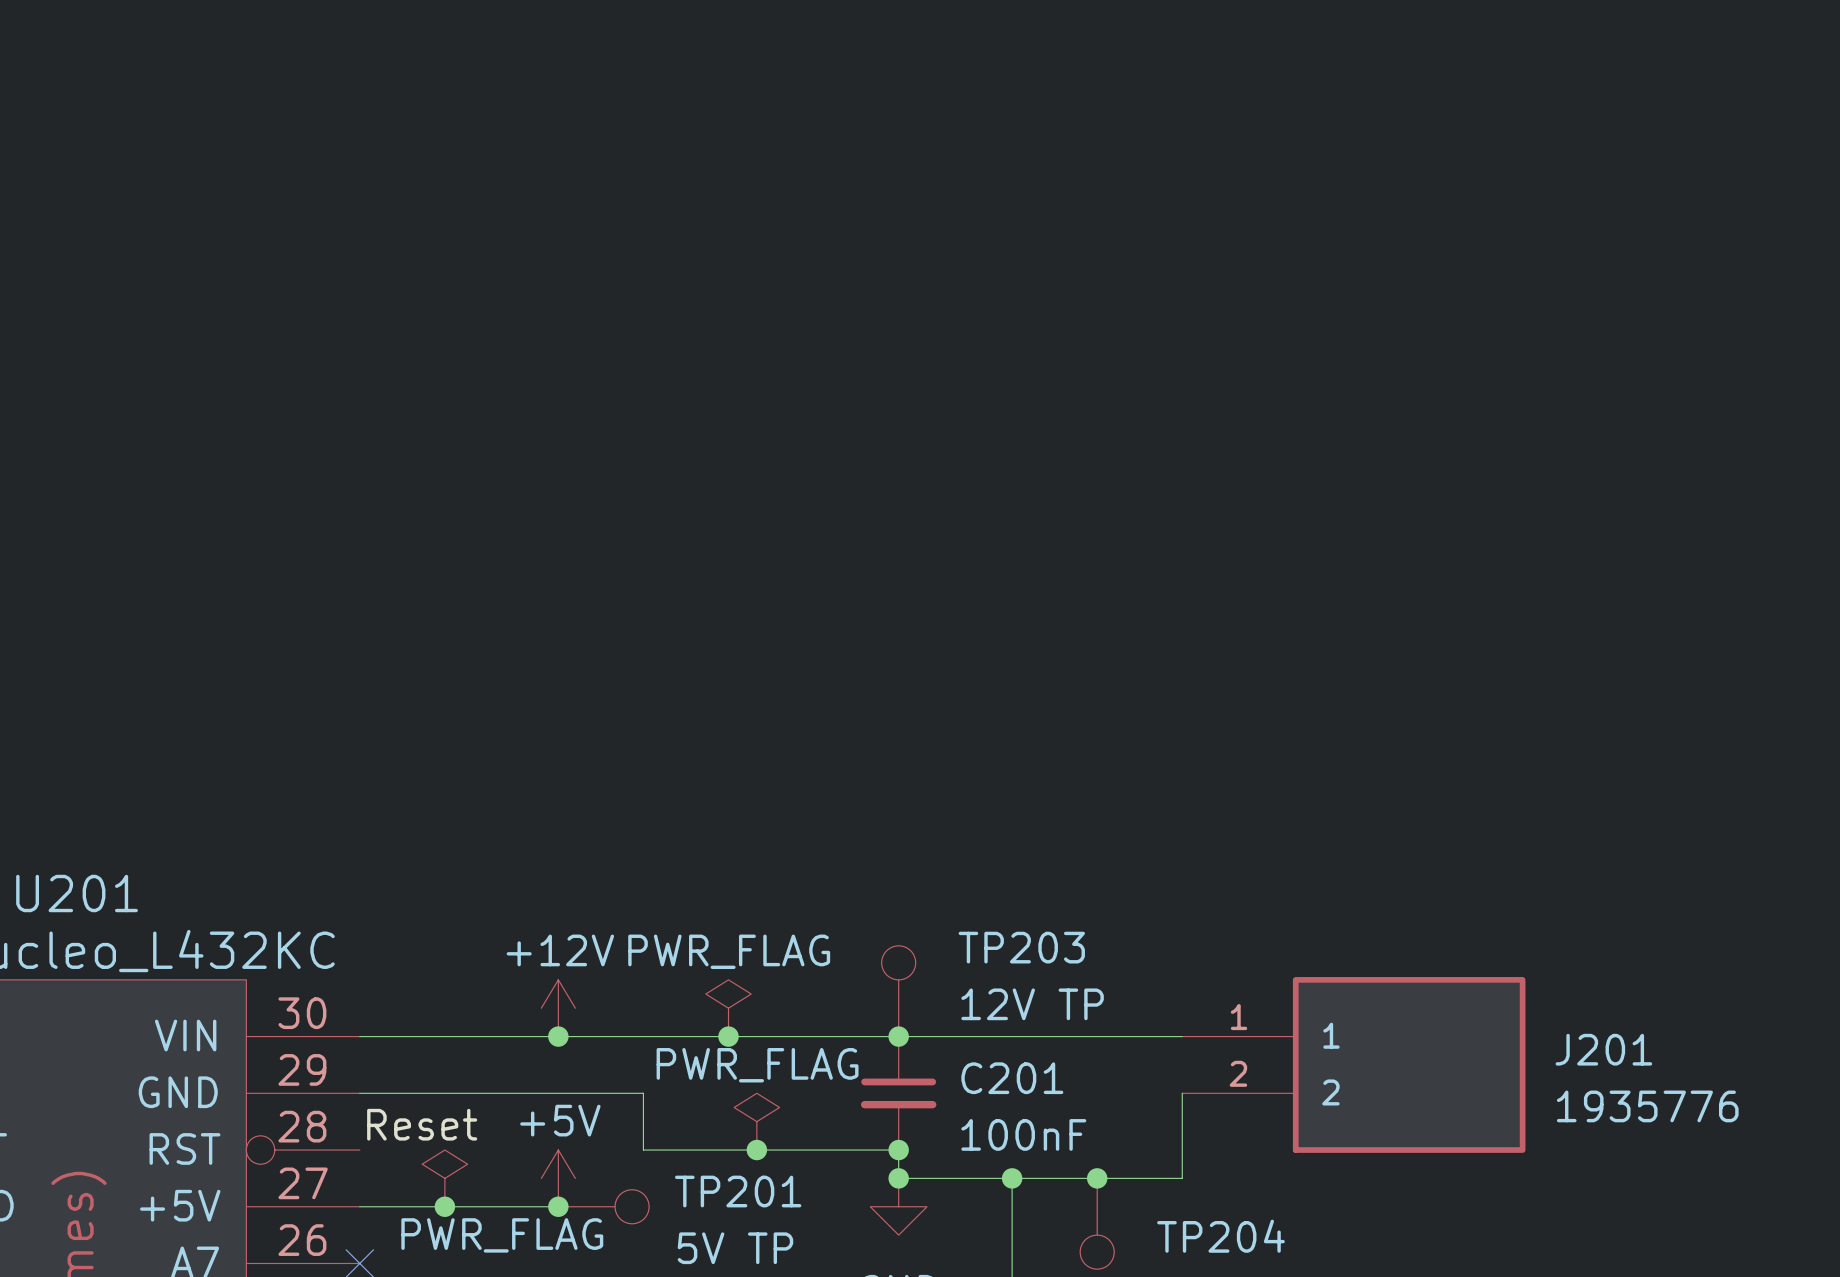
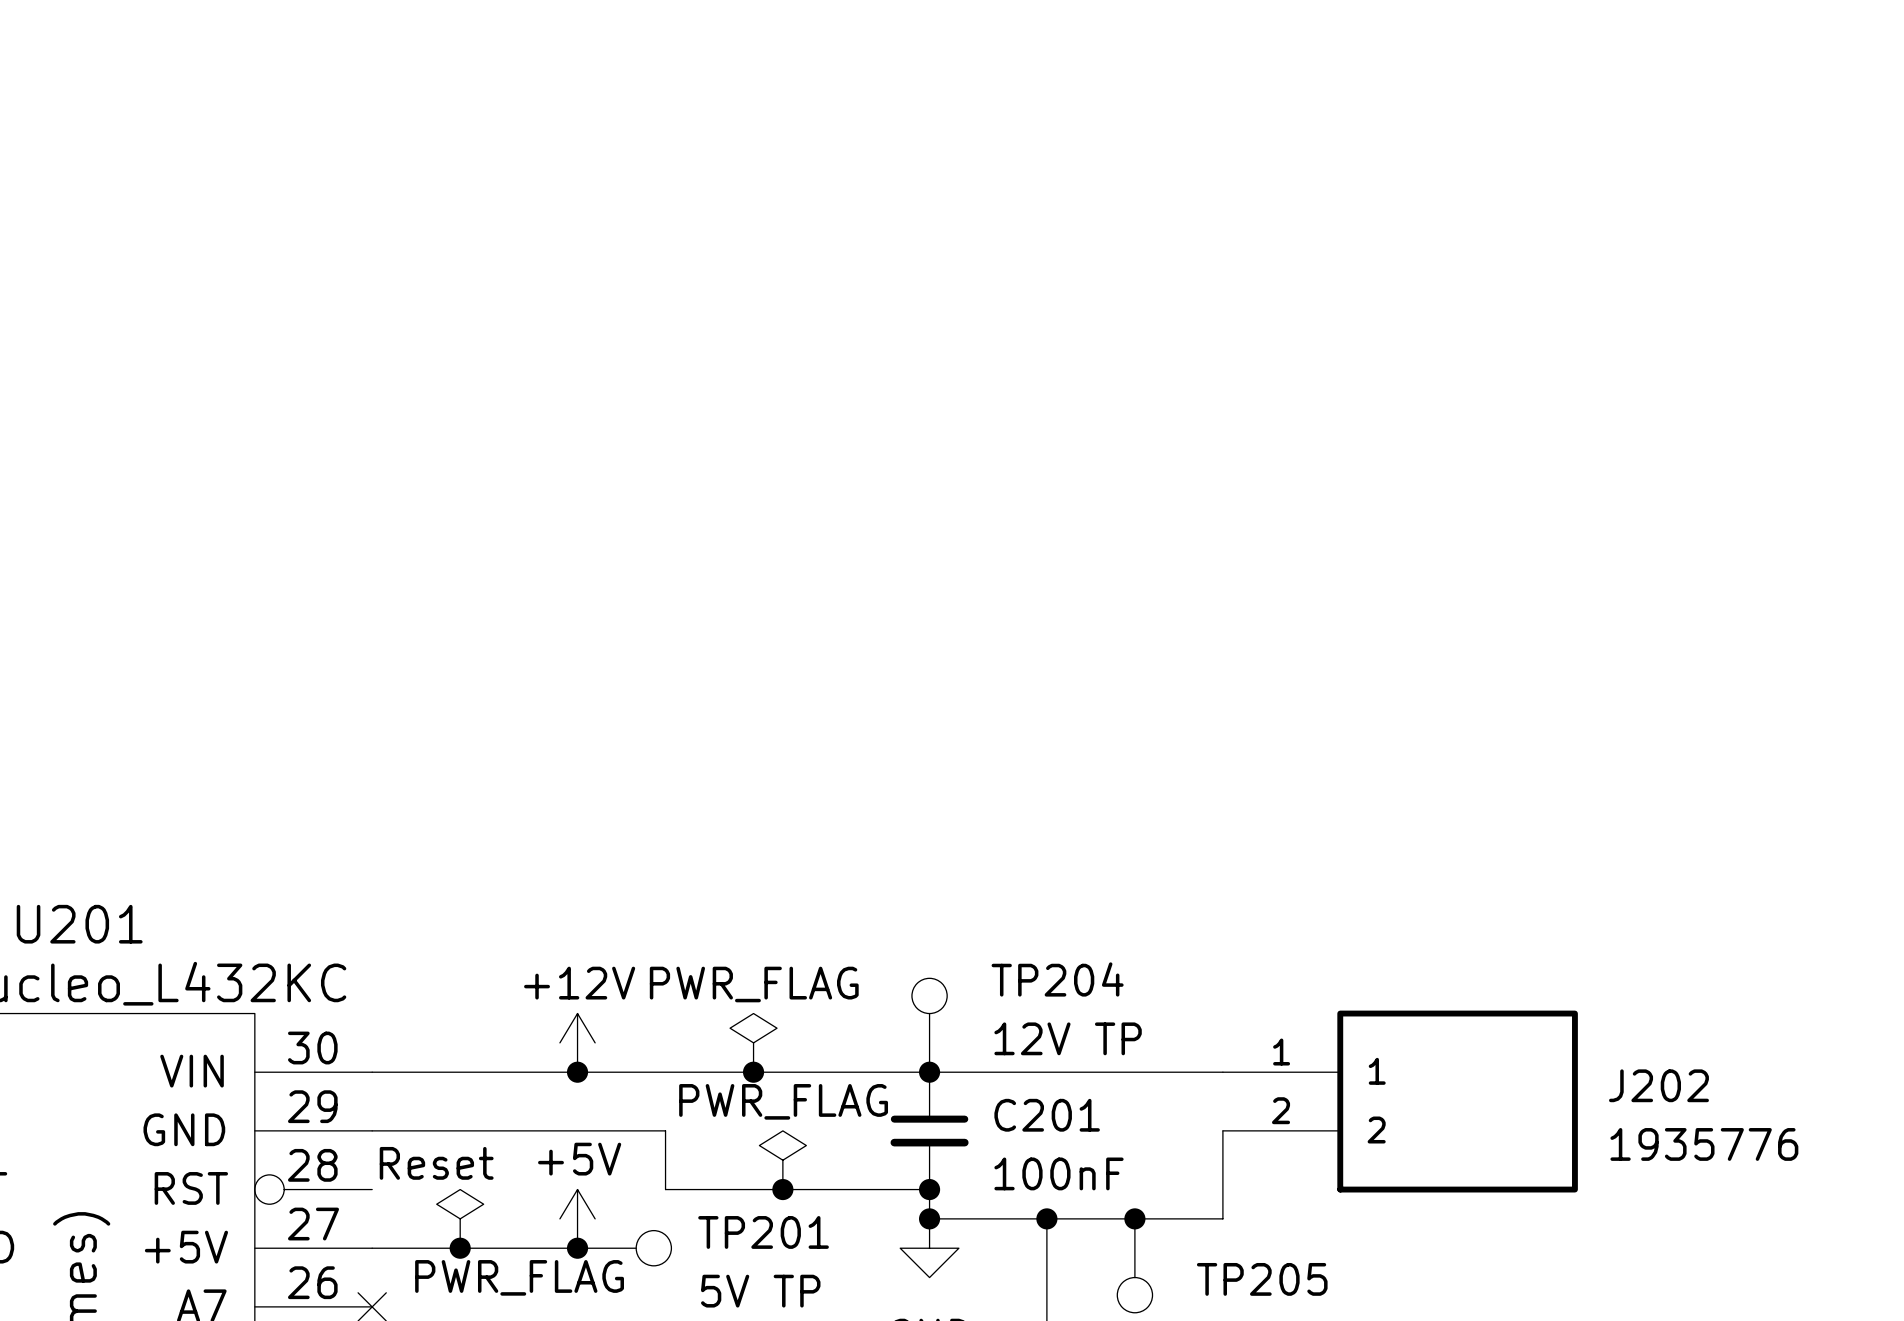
TP203 name: TP203 (1021, 947) -> TP204 (1057, 979)
J201 name: J201 (1603, 1049) -> J202 (1658, 1085)
TP204 name: TP204 (1220, 1236) -> TP205 (1262, 1279)

